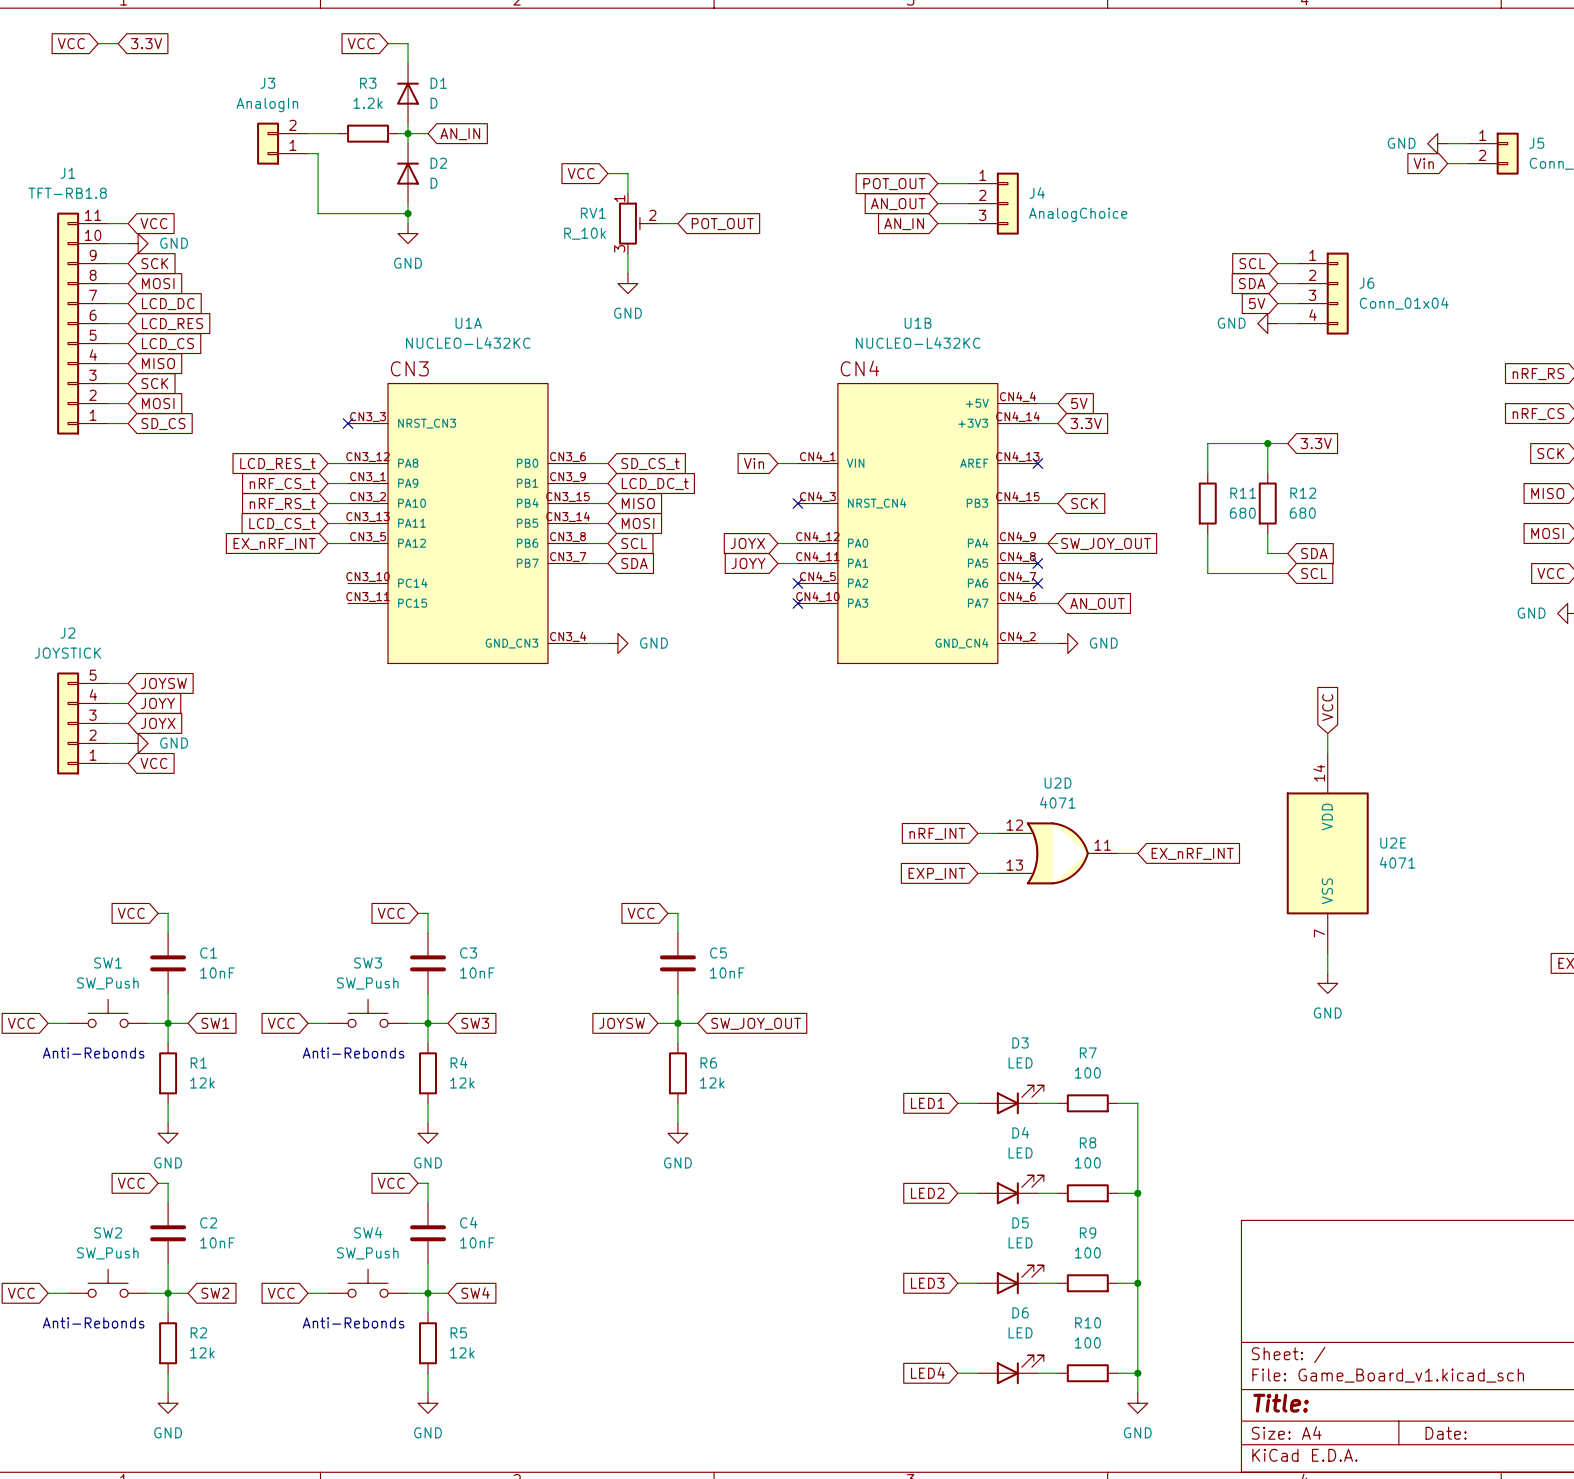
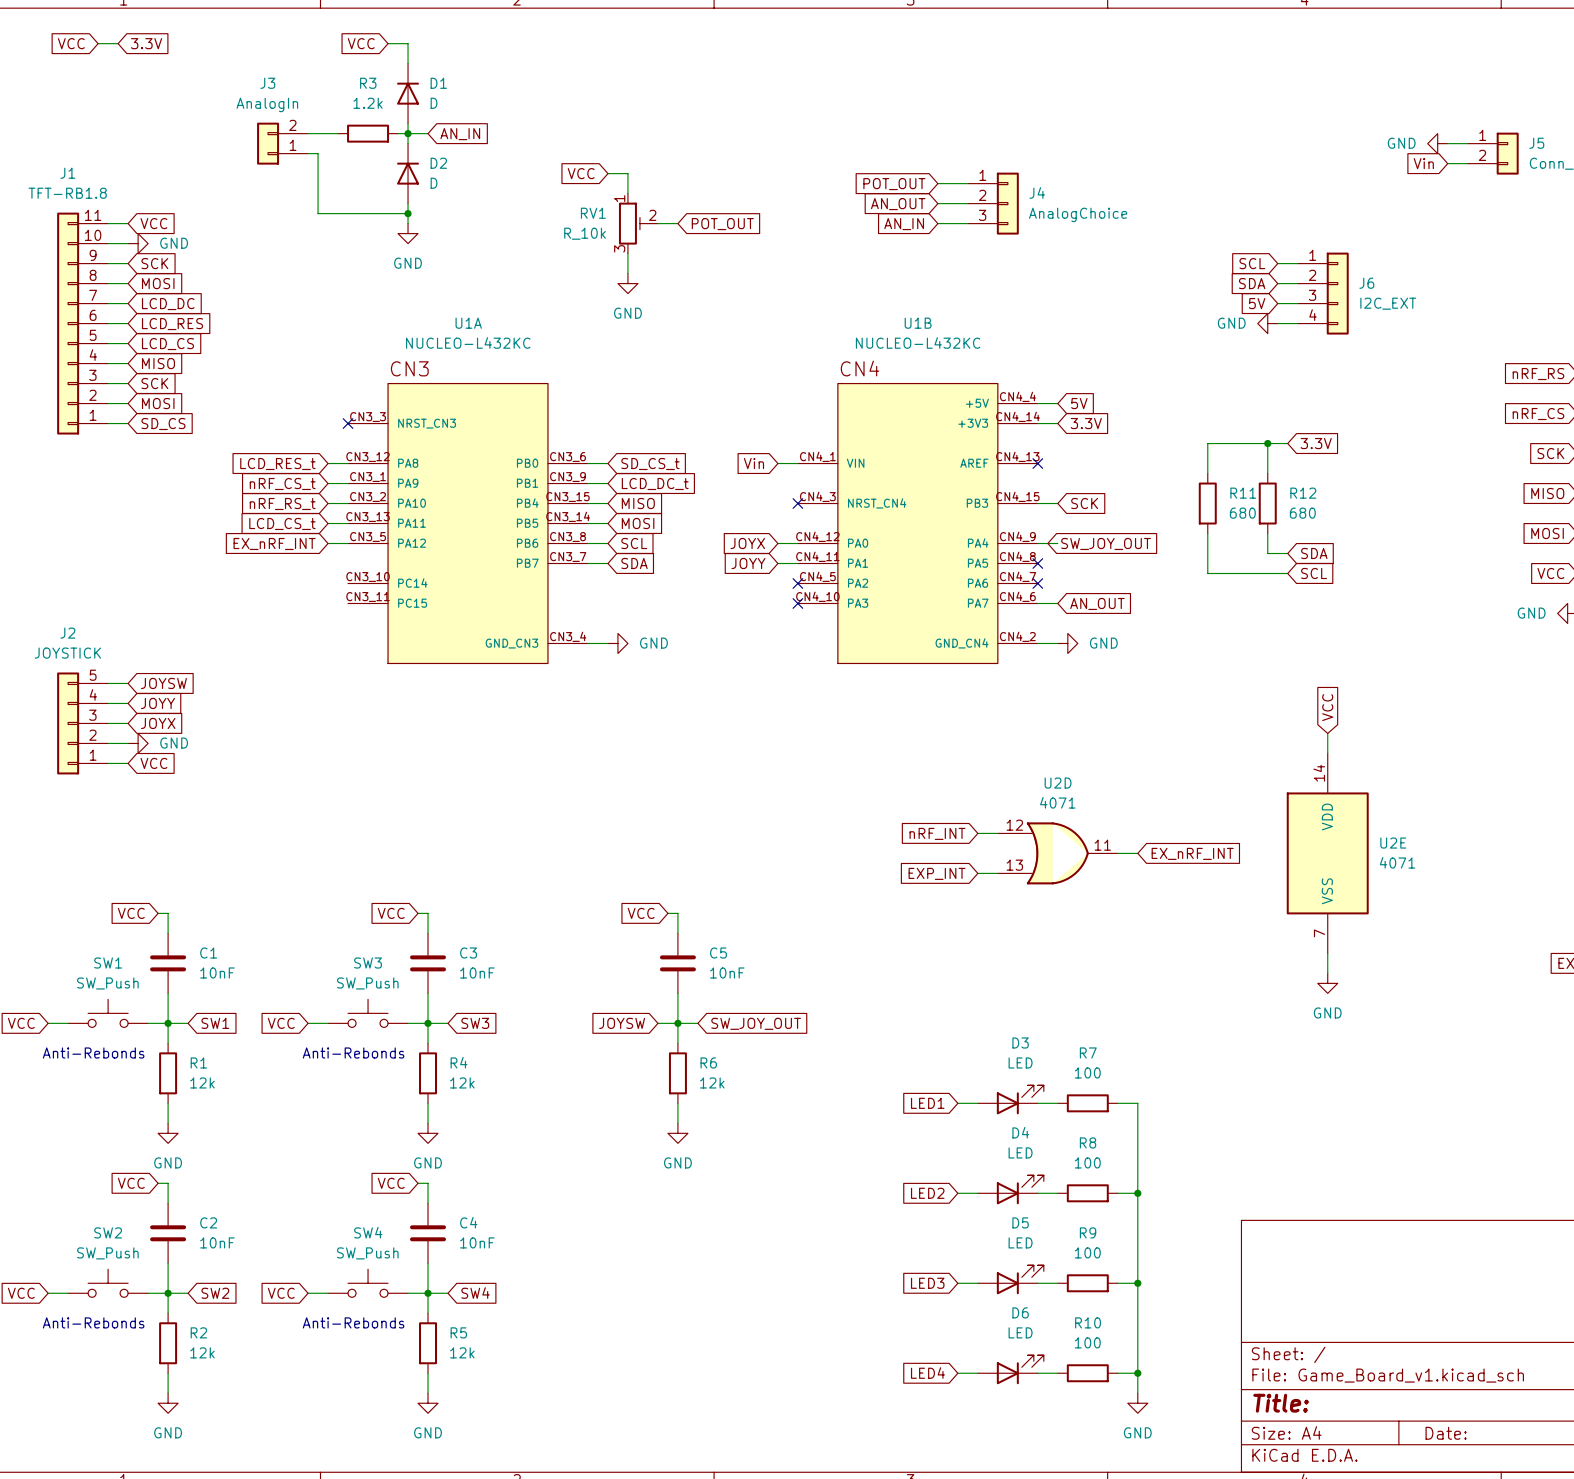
J6 value: Conn_01x04 (1404, 303) -> I2C_EXT (1388, 303)

